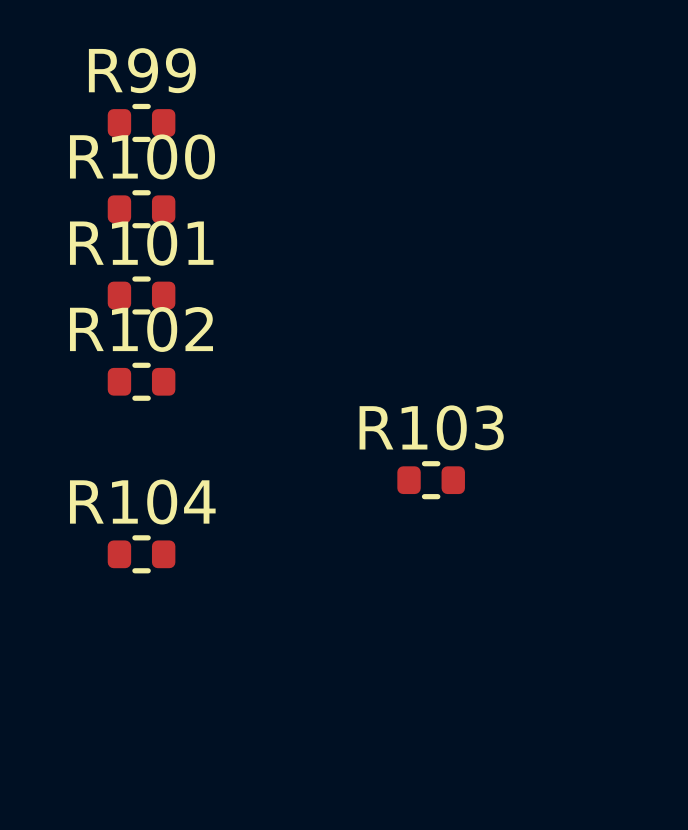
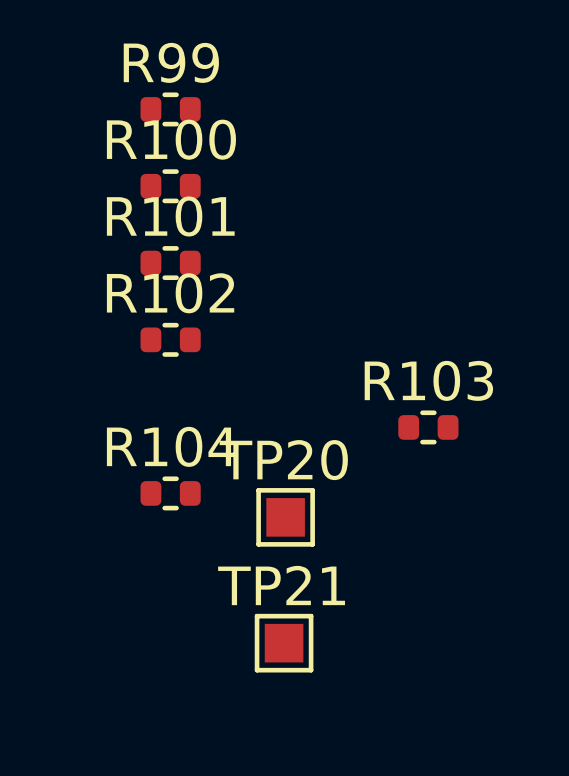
TP20: none -> (285, 517)
TP21: none -> (284, 643)

